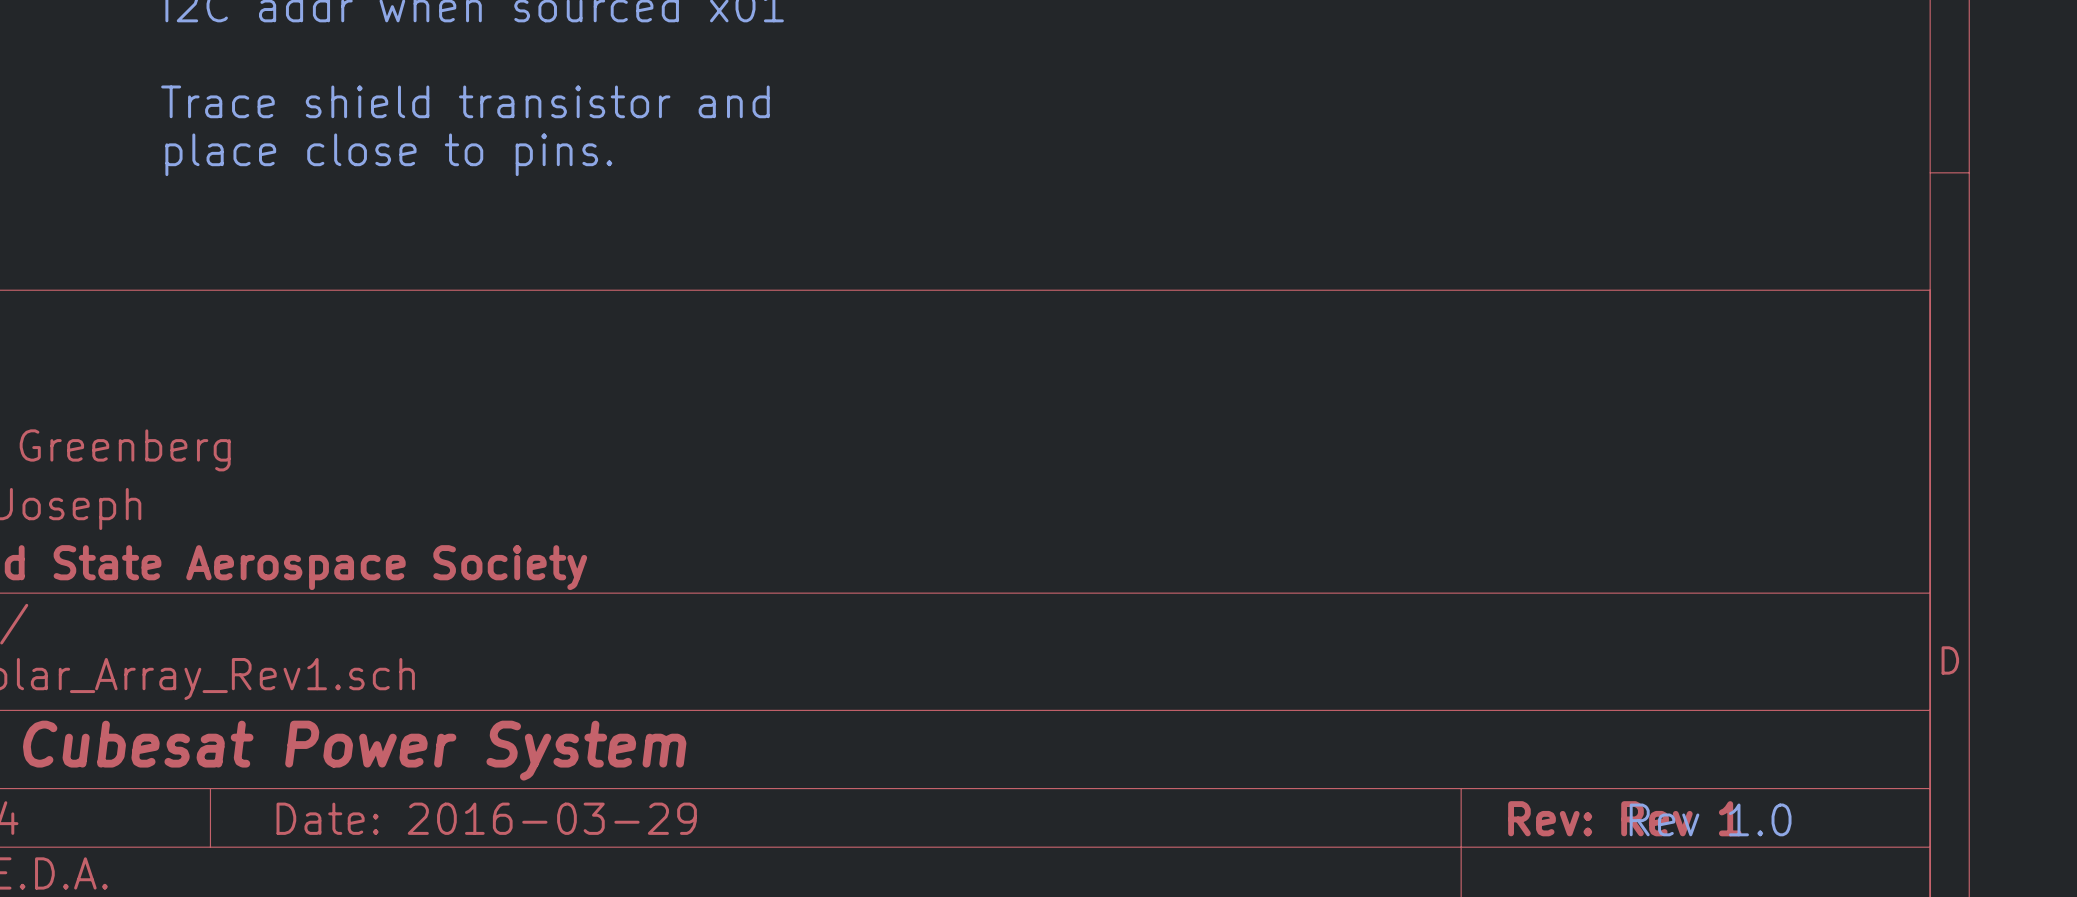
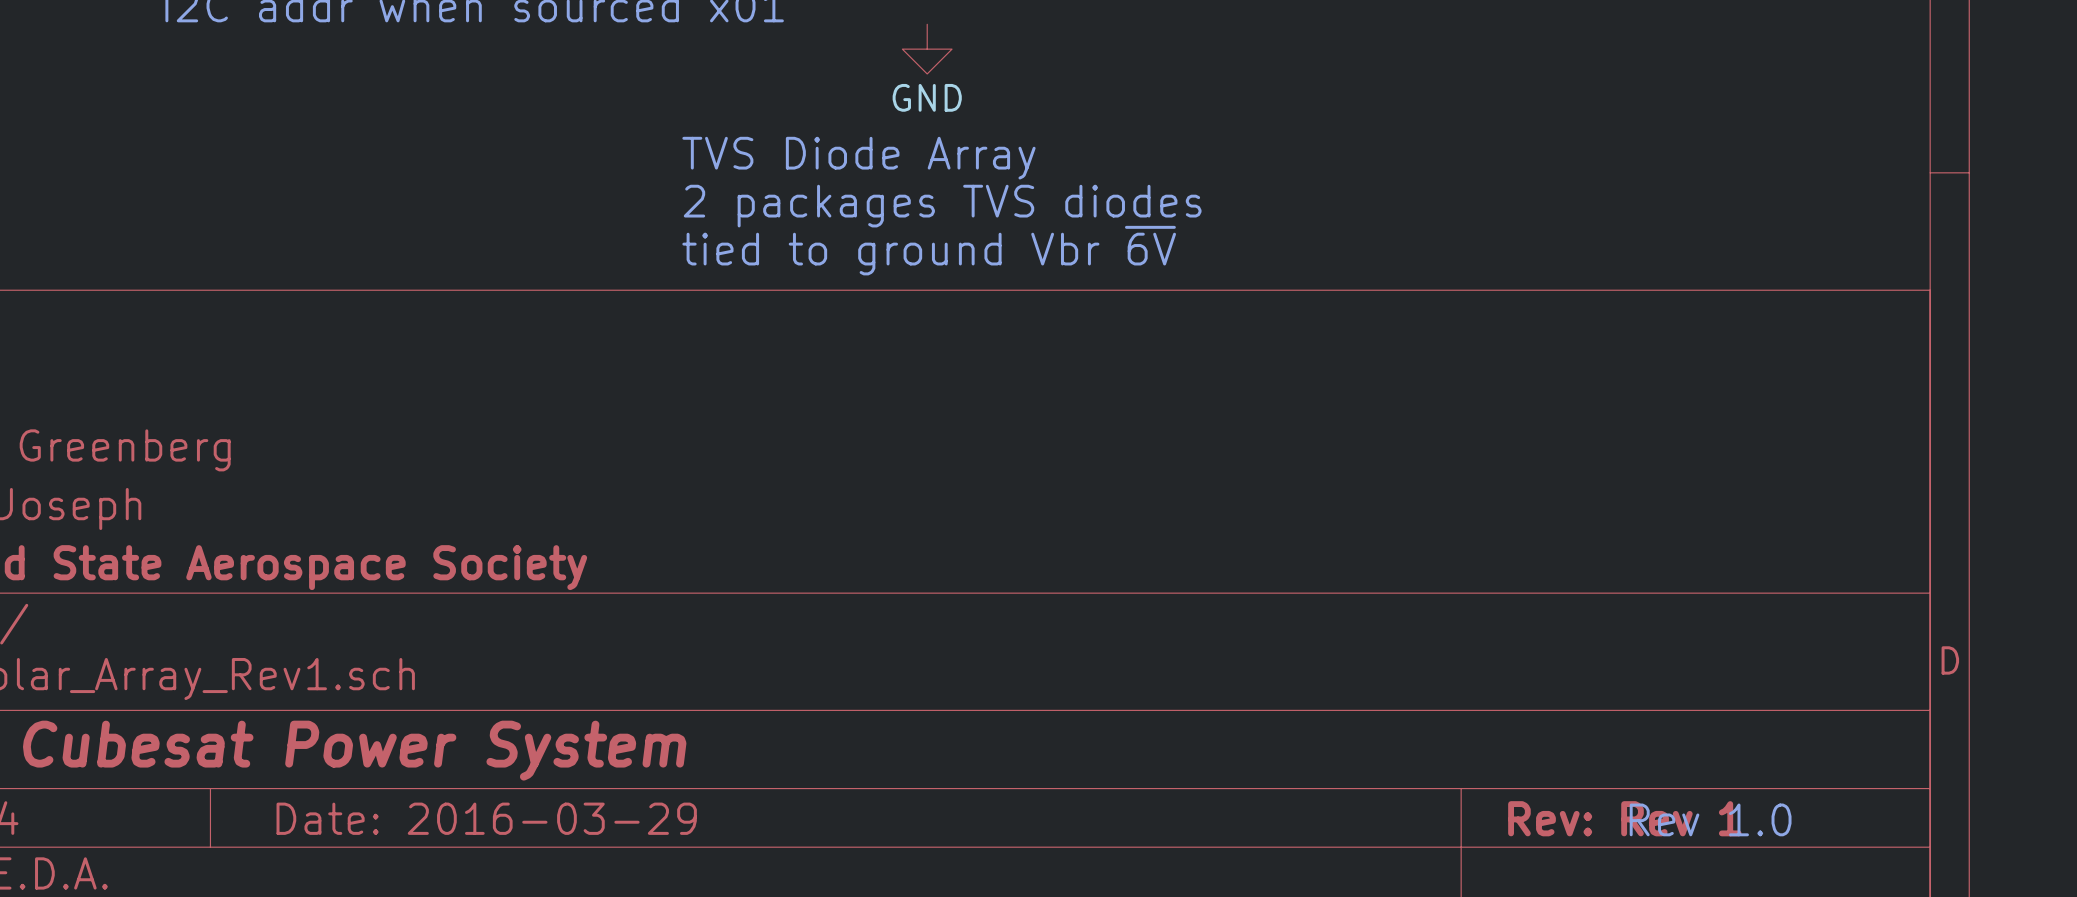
power symbol: none -> GND (927, 49)
text: Trace shield transistor and (465, 101) -> none
text: place close to pins. (388, 154) -> none
text: none -> TVS Diode Array (858, 158)
text: none -> 2 packages TVS diodes (942, 206)
text: none -> tied to ground Vbr ~{6V} (929, 250)

